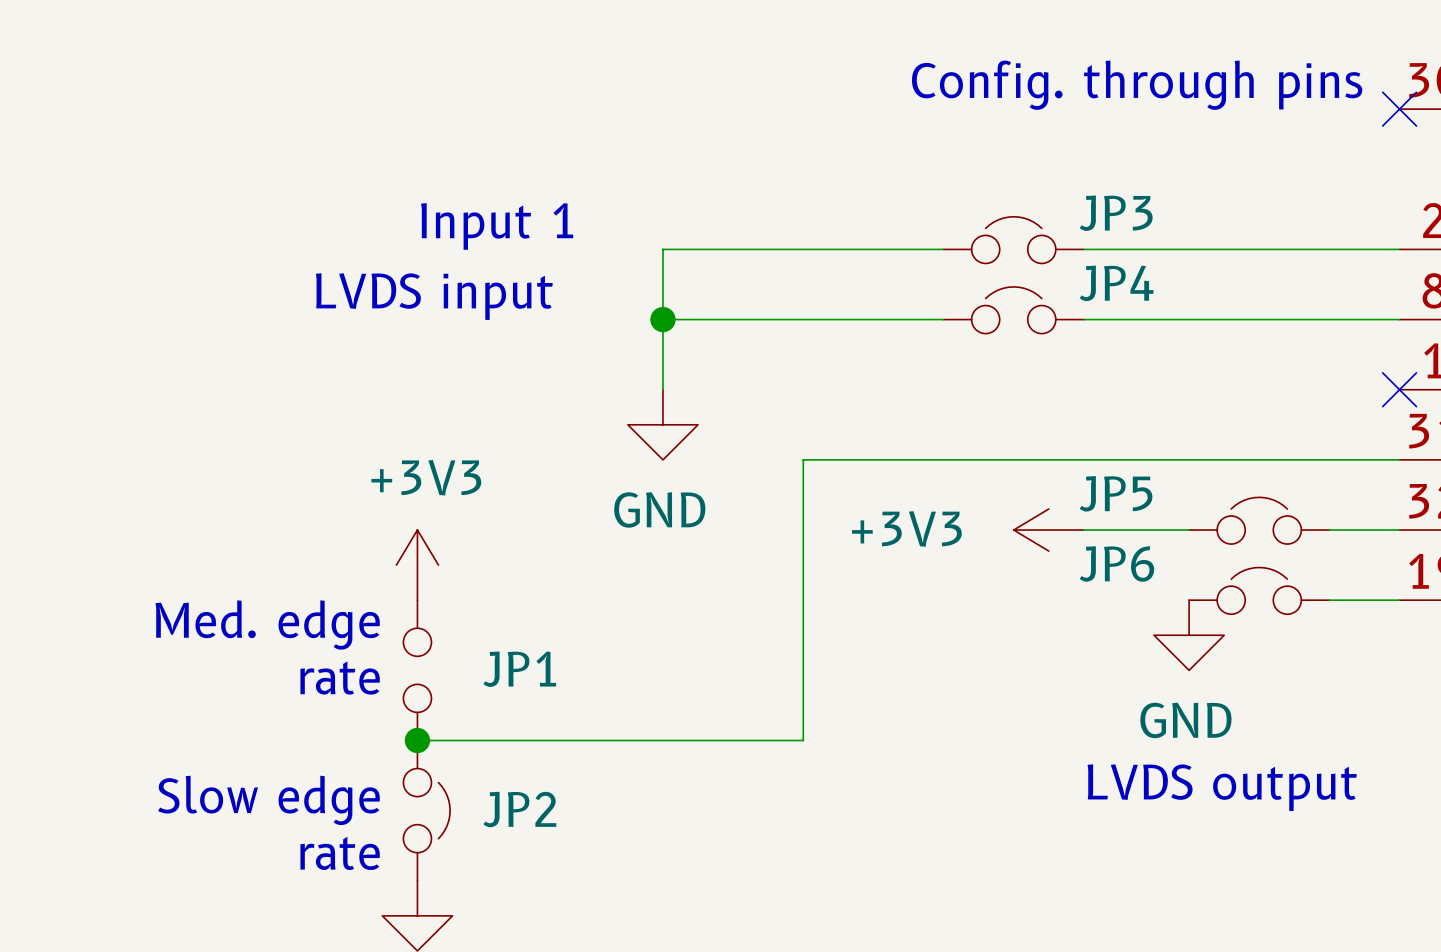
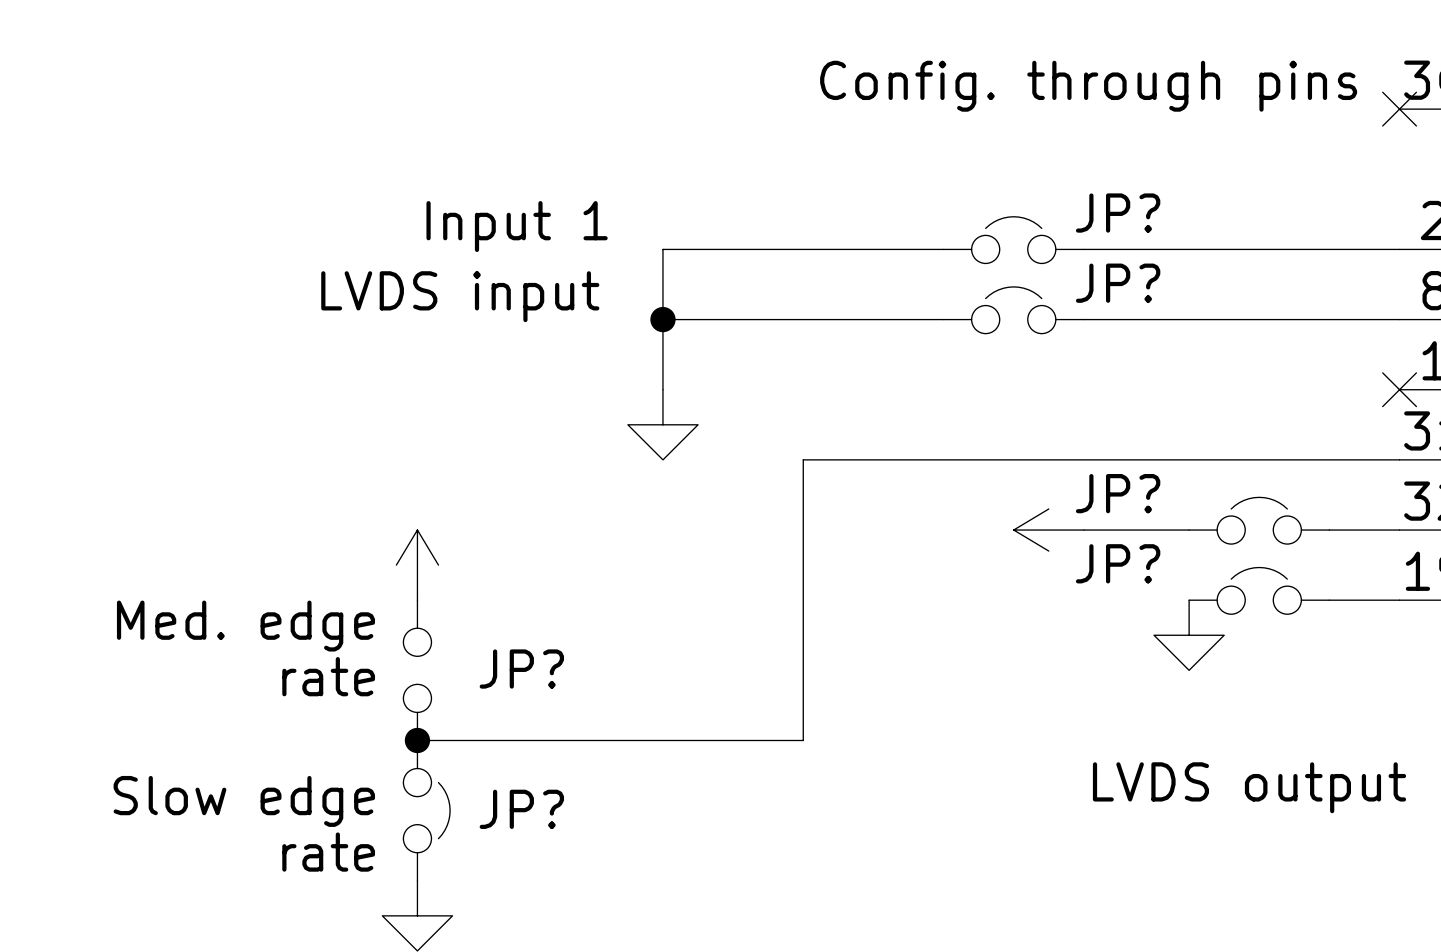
JP3 name: JP3 (1116, 213) -> JP? (1118, 213)
JP4 name: JP4 (1116, 283) -> JP? (1118, 283)
power symbol text: +3V3 (426, 477) -> none
JP5 name: JP5 (1116, 493) -> JP? (1118, 493)
power symbol text: GND (659, 509) -> none
power symbol text: +3V3 (906, 528) -> none
JP6 name: JP6 (1116, 563) -> JP? (1118, 563)
JP1 name: JP1 (519, 669) -> JP? (521, 669)
power symbol text: GND (1185, 720) -> none
JP2 name: JP2 (519, 809) -> JP? (521, 809)

